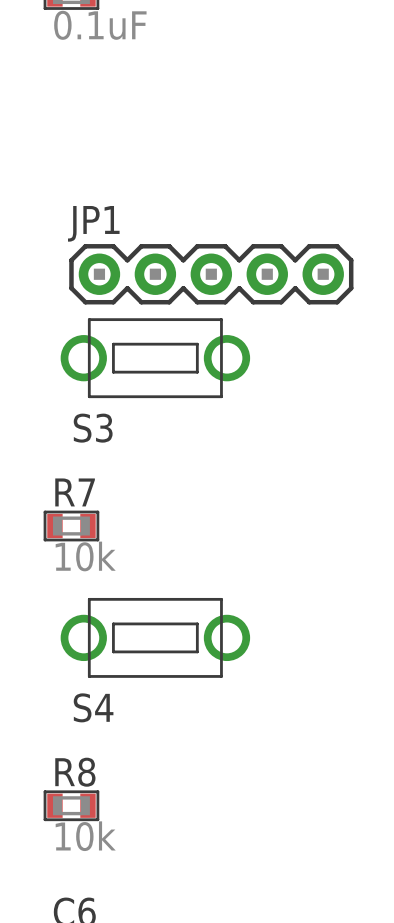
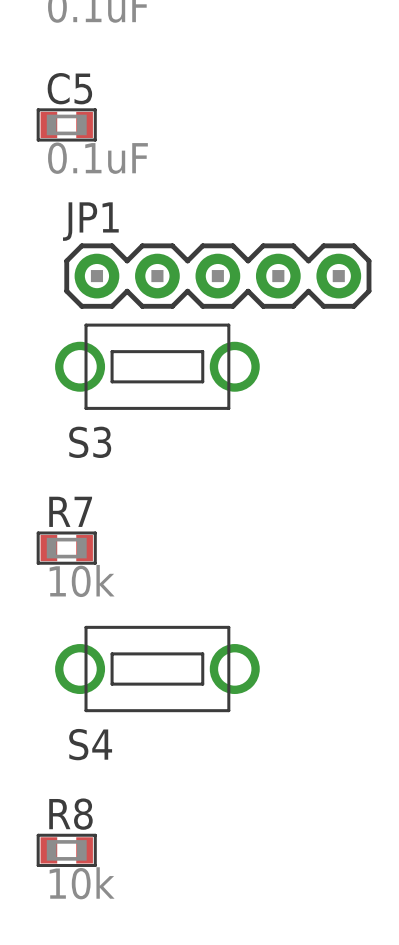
C5: none -> 0.1uF (66, 124)

